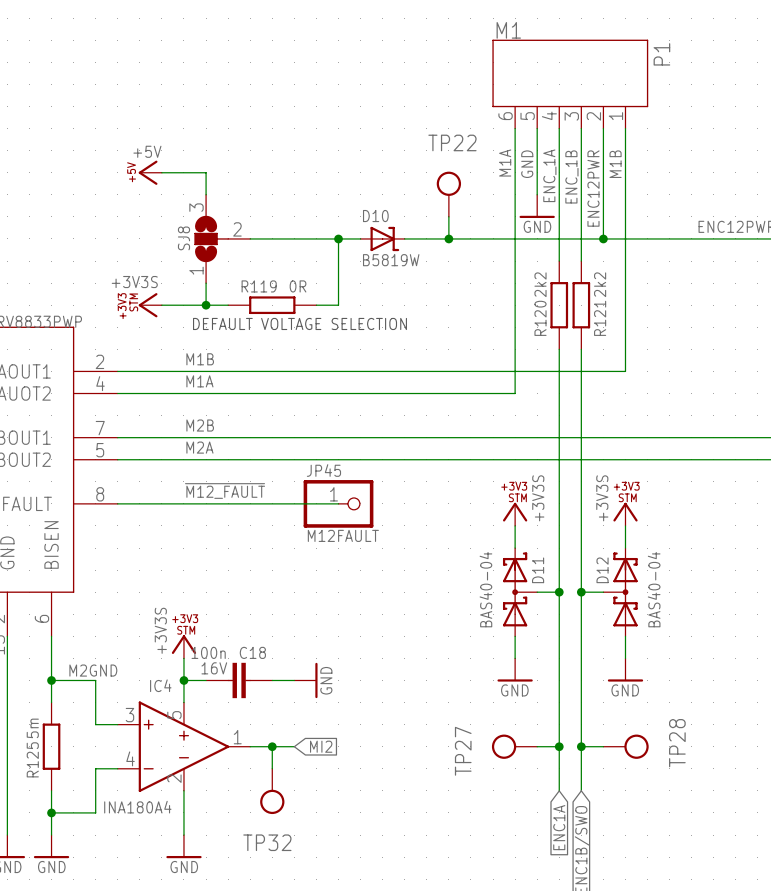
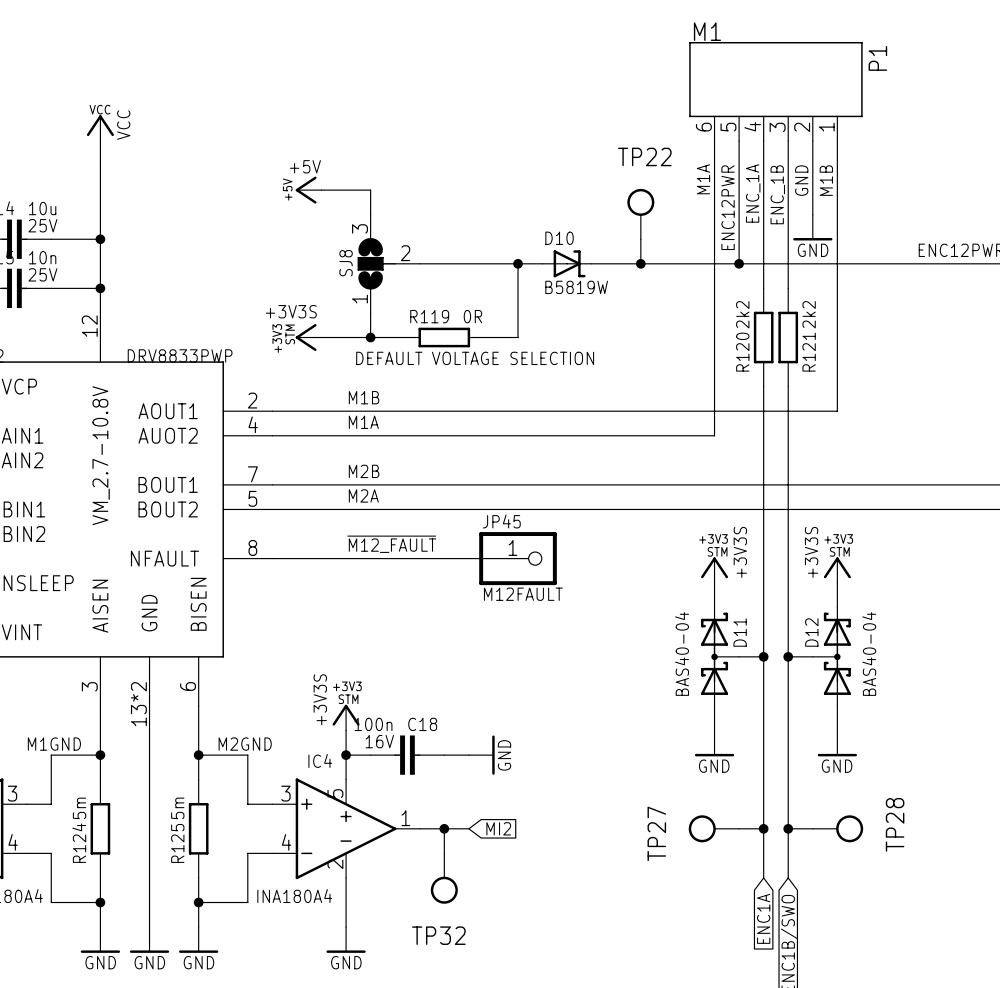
label: GND (527, 164) -> ENC12PWR (728, 207)
label: ENC12PWR (593, 188) -> GND (801, 180)
power symbol position: GND (537, 206) -> GND (812, 227)
junction: none -> (739, 263)
junction: (603, 238) -> none

